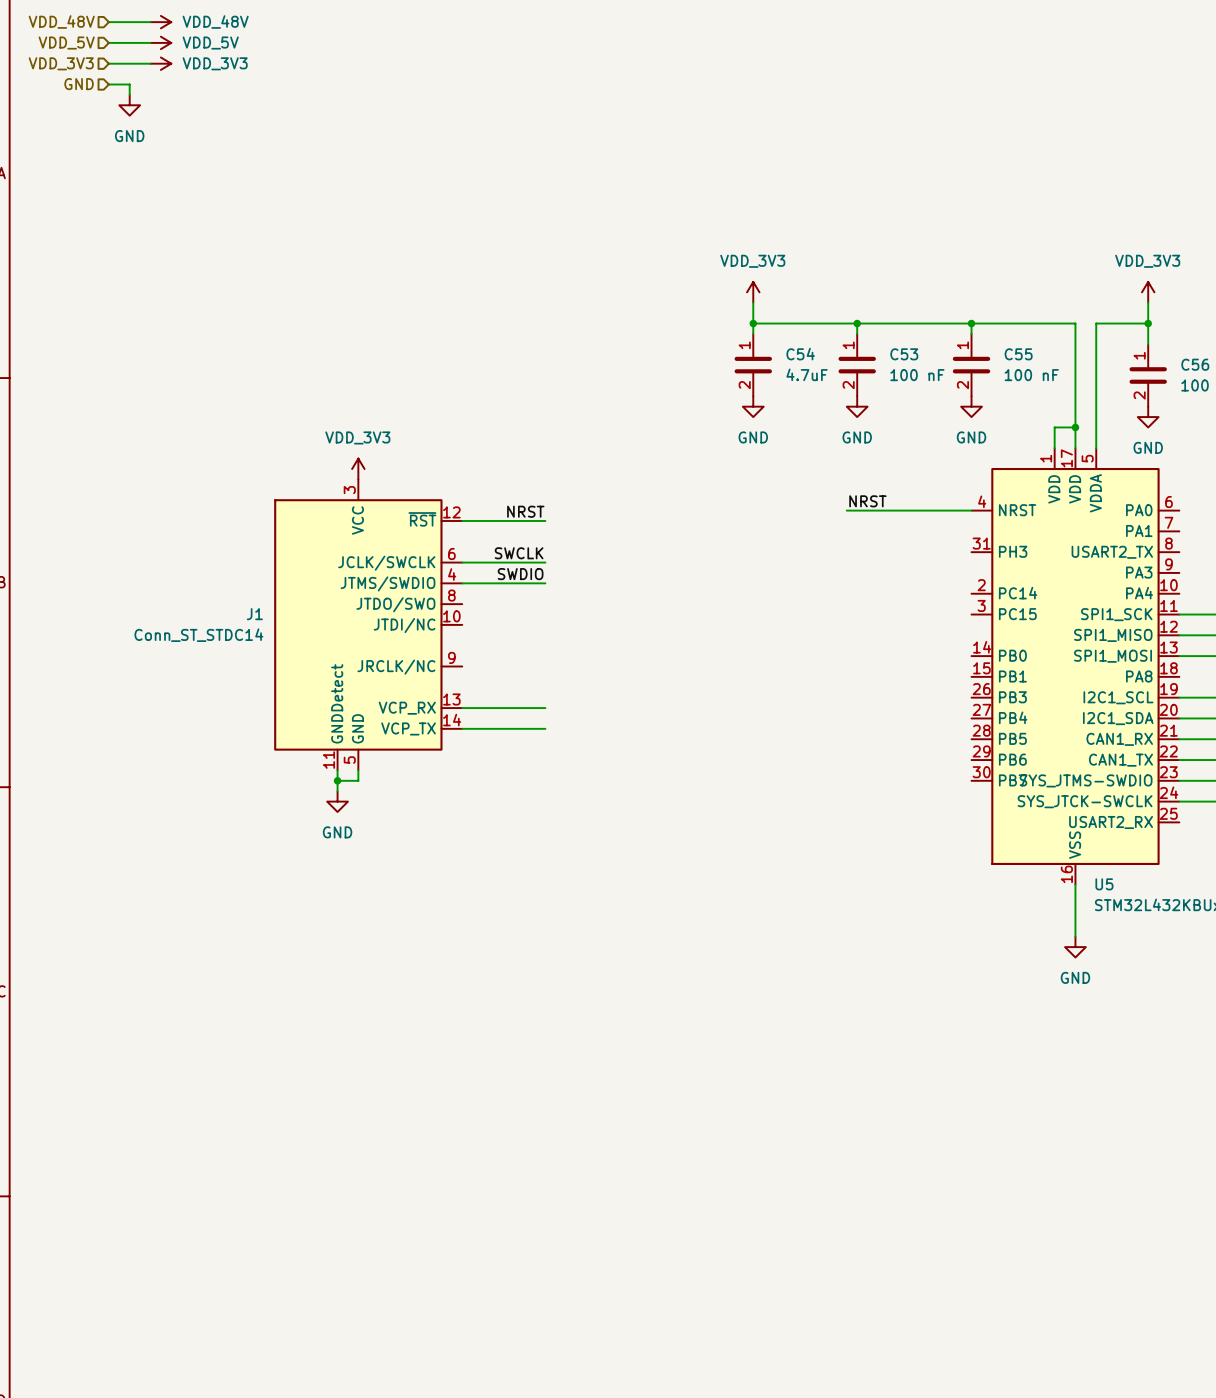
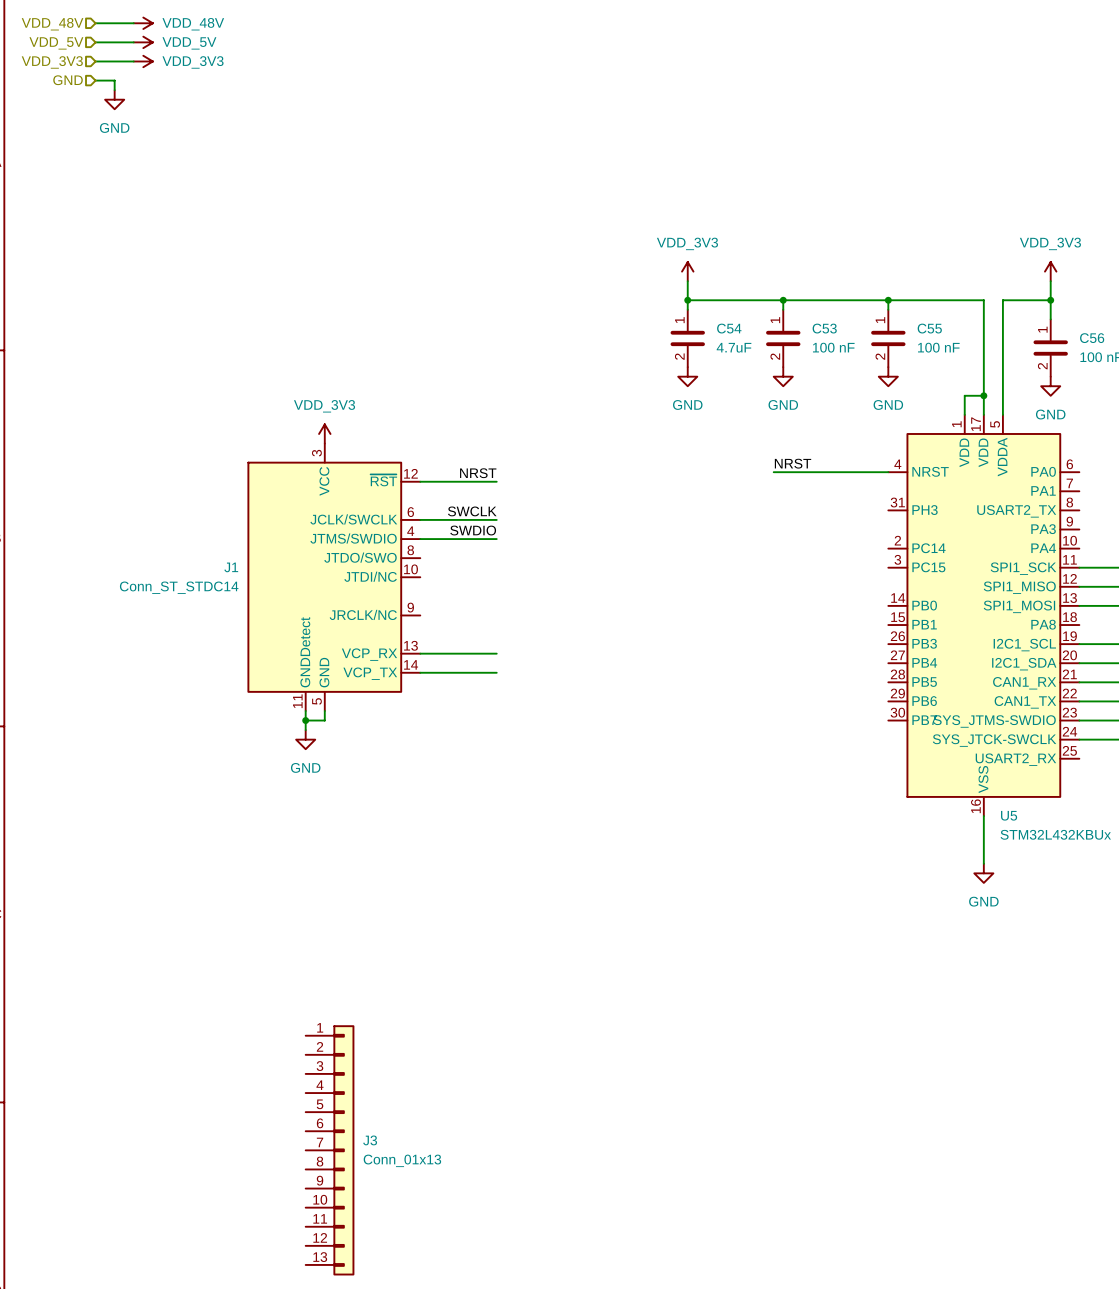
J3: none -> Conn_01x13 (330, 1150)

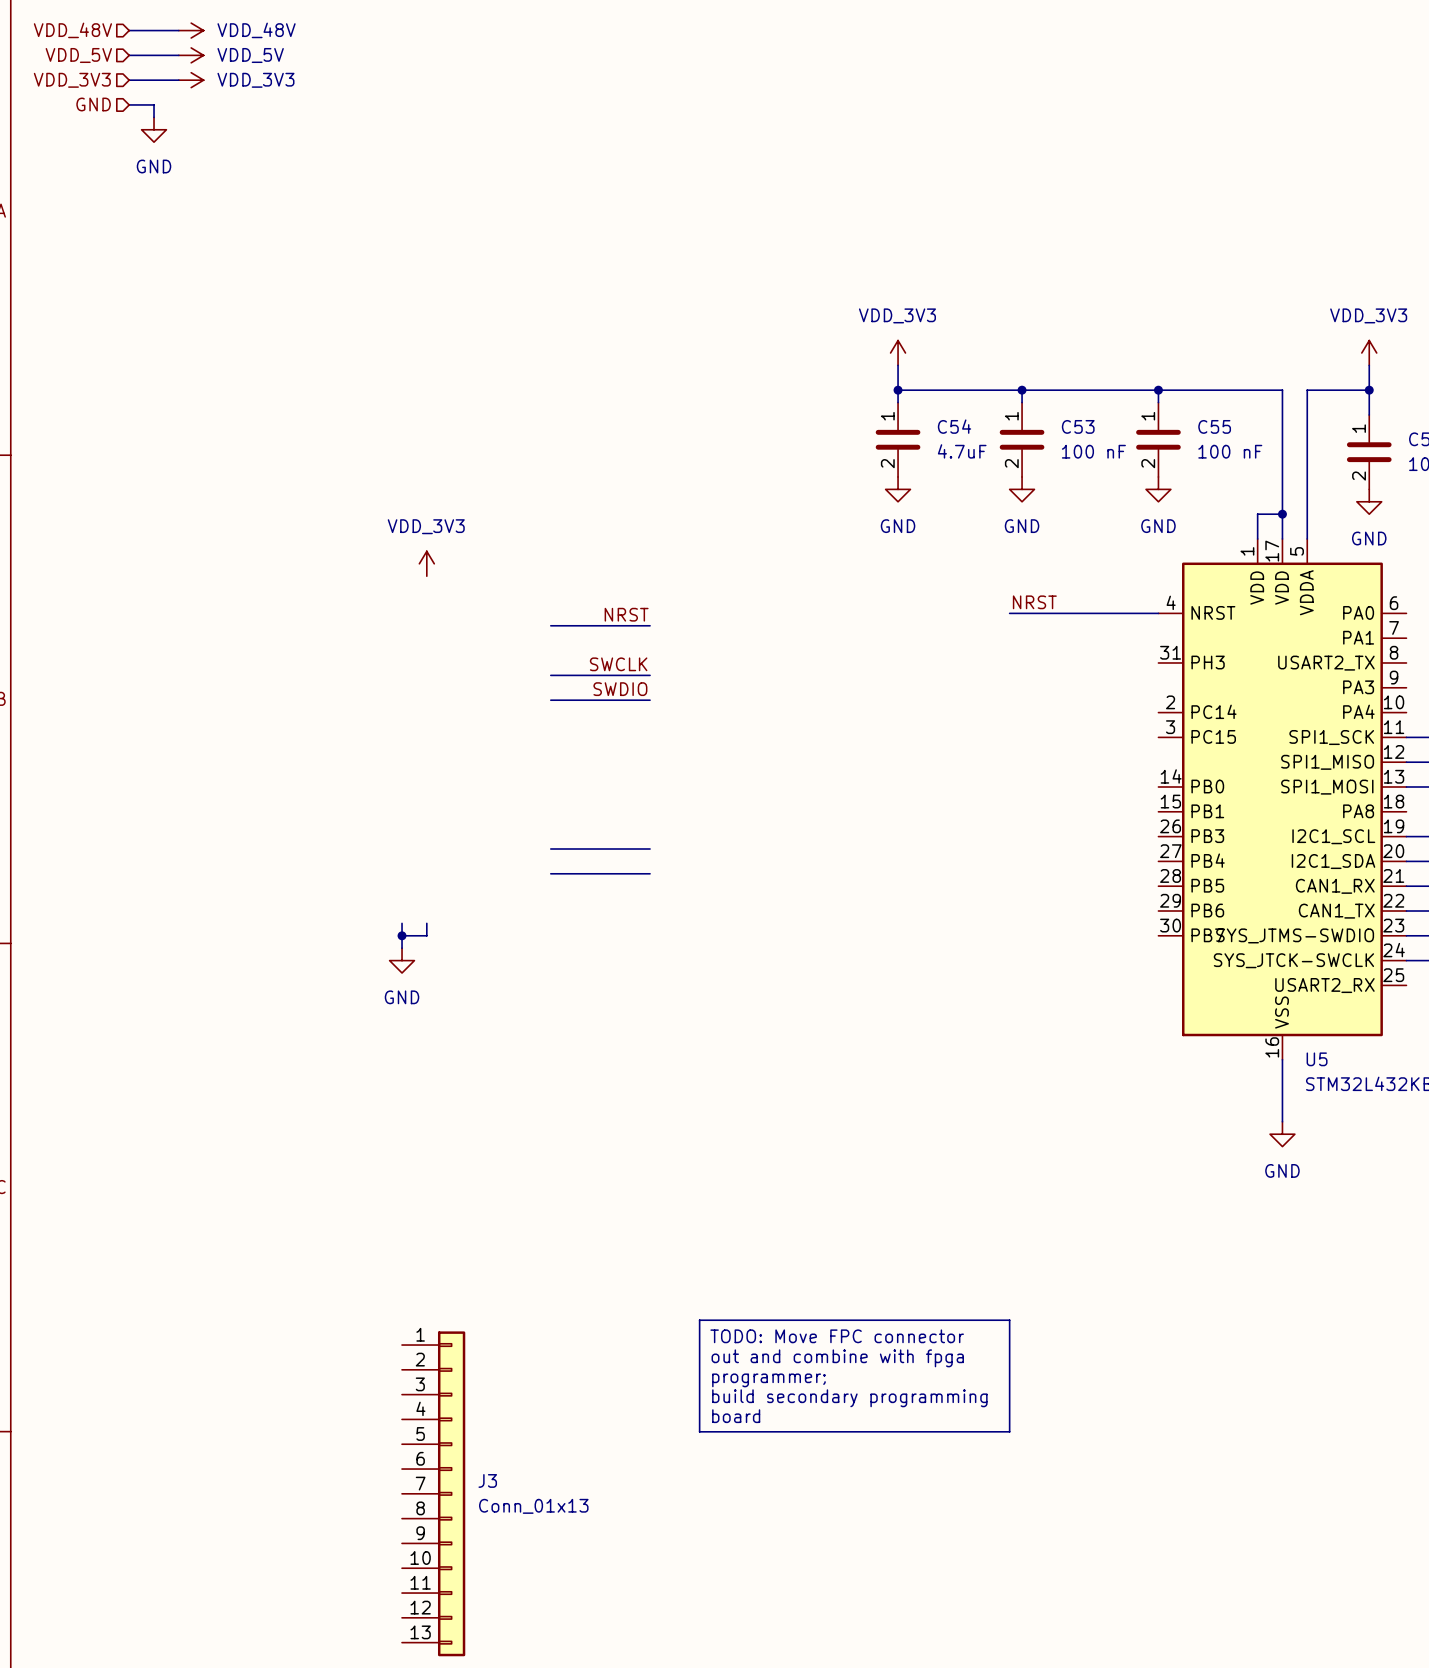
J1: Conn_ST_STDC14 (333, 577) -> none
line: none -> (699, 1320) (1009, 1320) (1009, 1431) (699, 1431) (699, 1320)
text: none -> TODO: Move FPC connector (837, 1336)
text: none -> out and combine with fpga (837, 1358)
text: none -> programmer; (768, 1380)
text: none -> build secondary programming (849, 1398)
text: none -> board (736, 1416)

